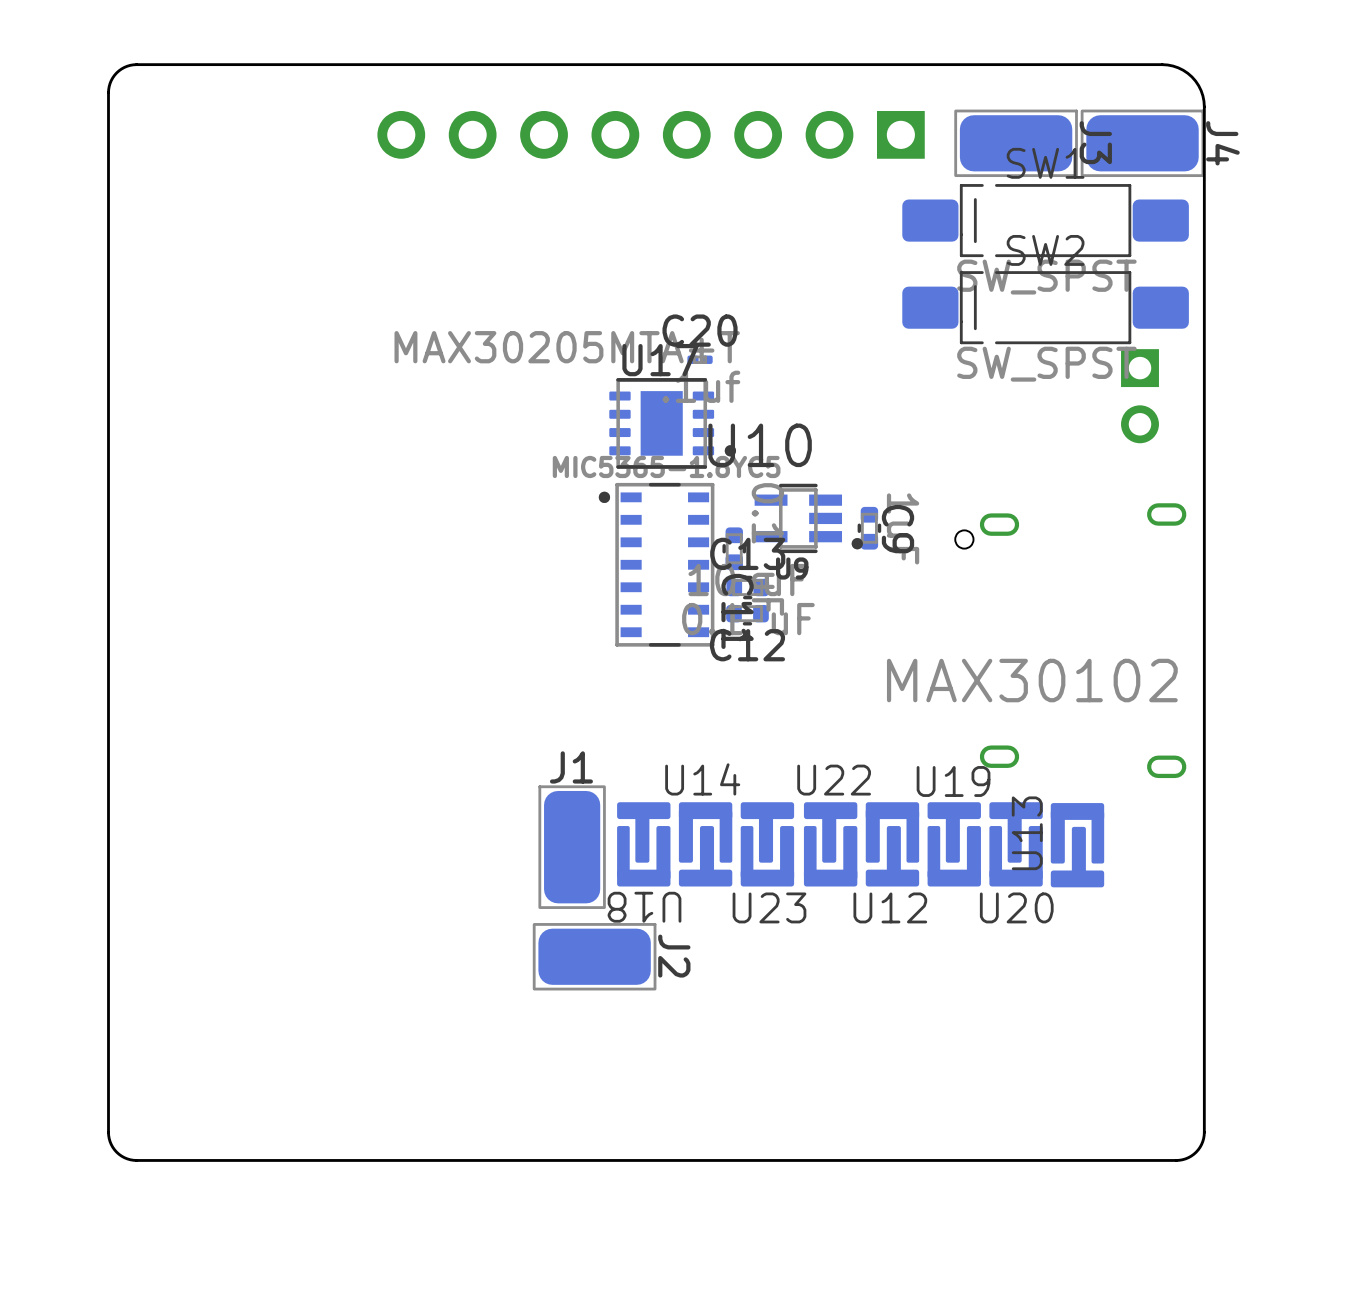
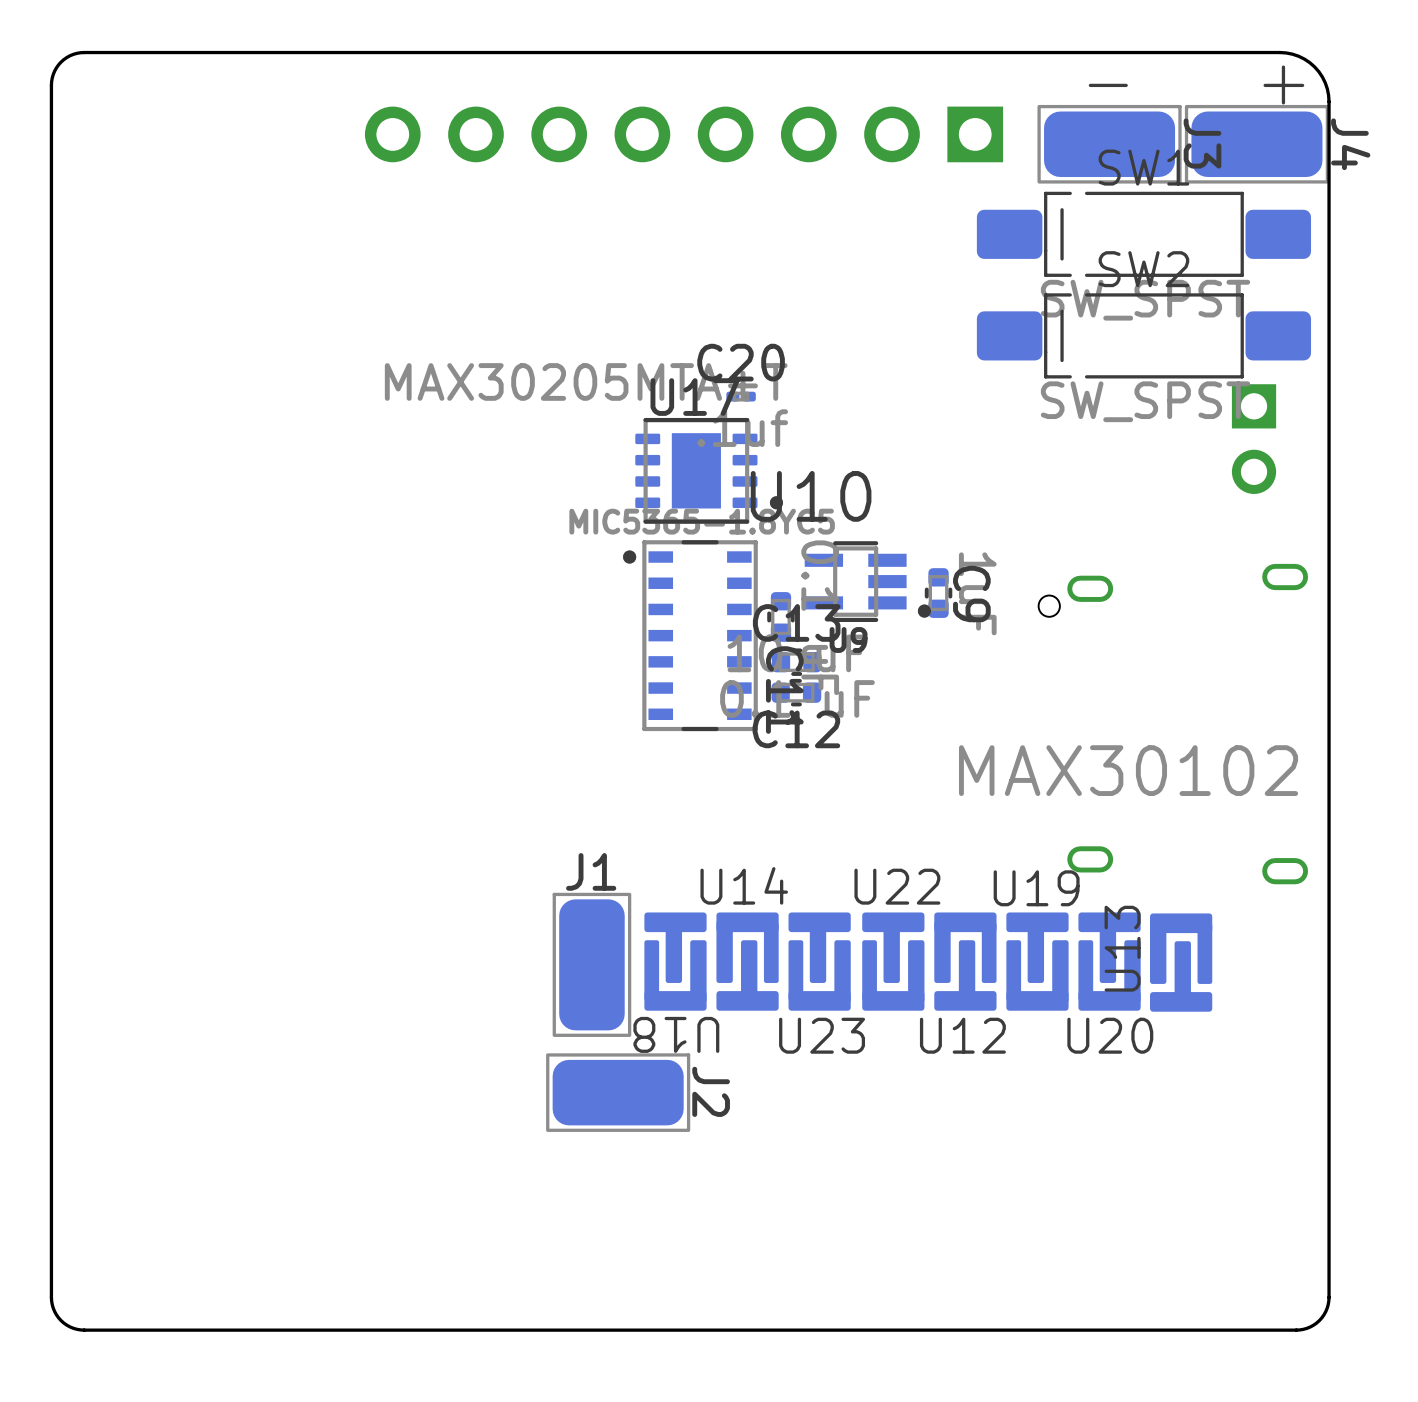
line: none -> (1283, 67) (1283, 102)
line: none -> (1126, 85) (1090, 85)
line: none -> (1302, 85) (1265, 85)

